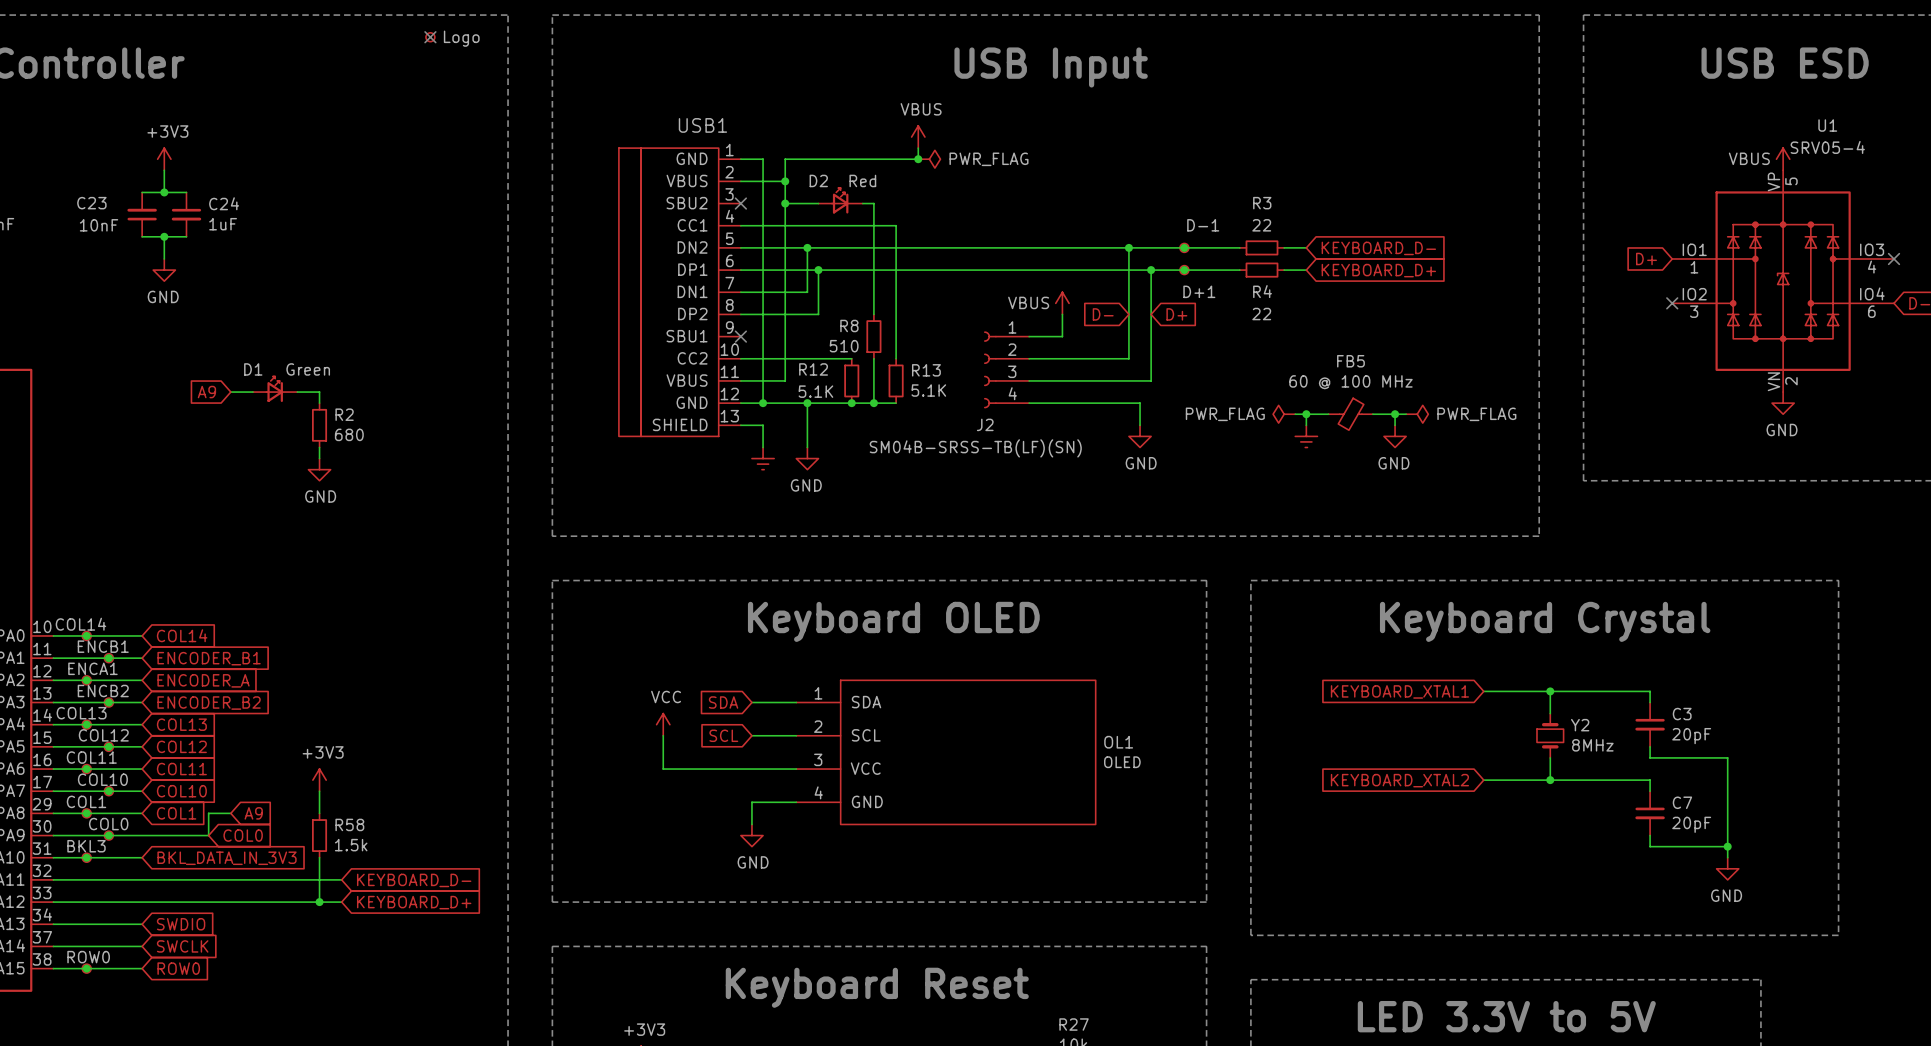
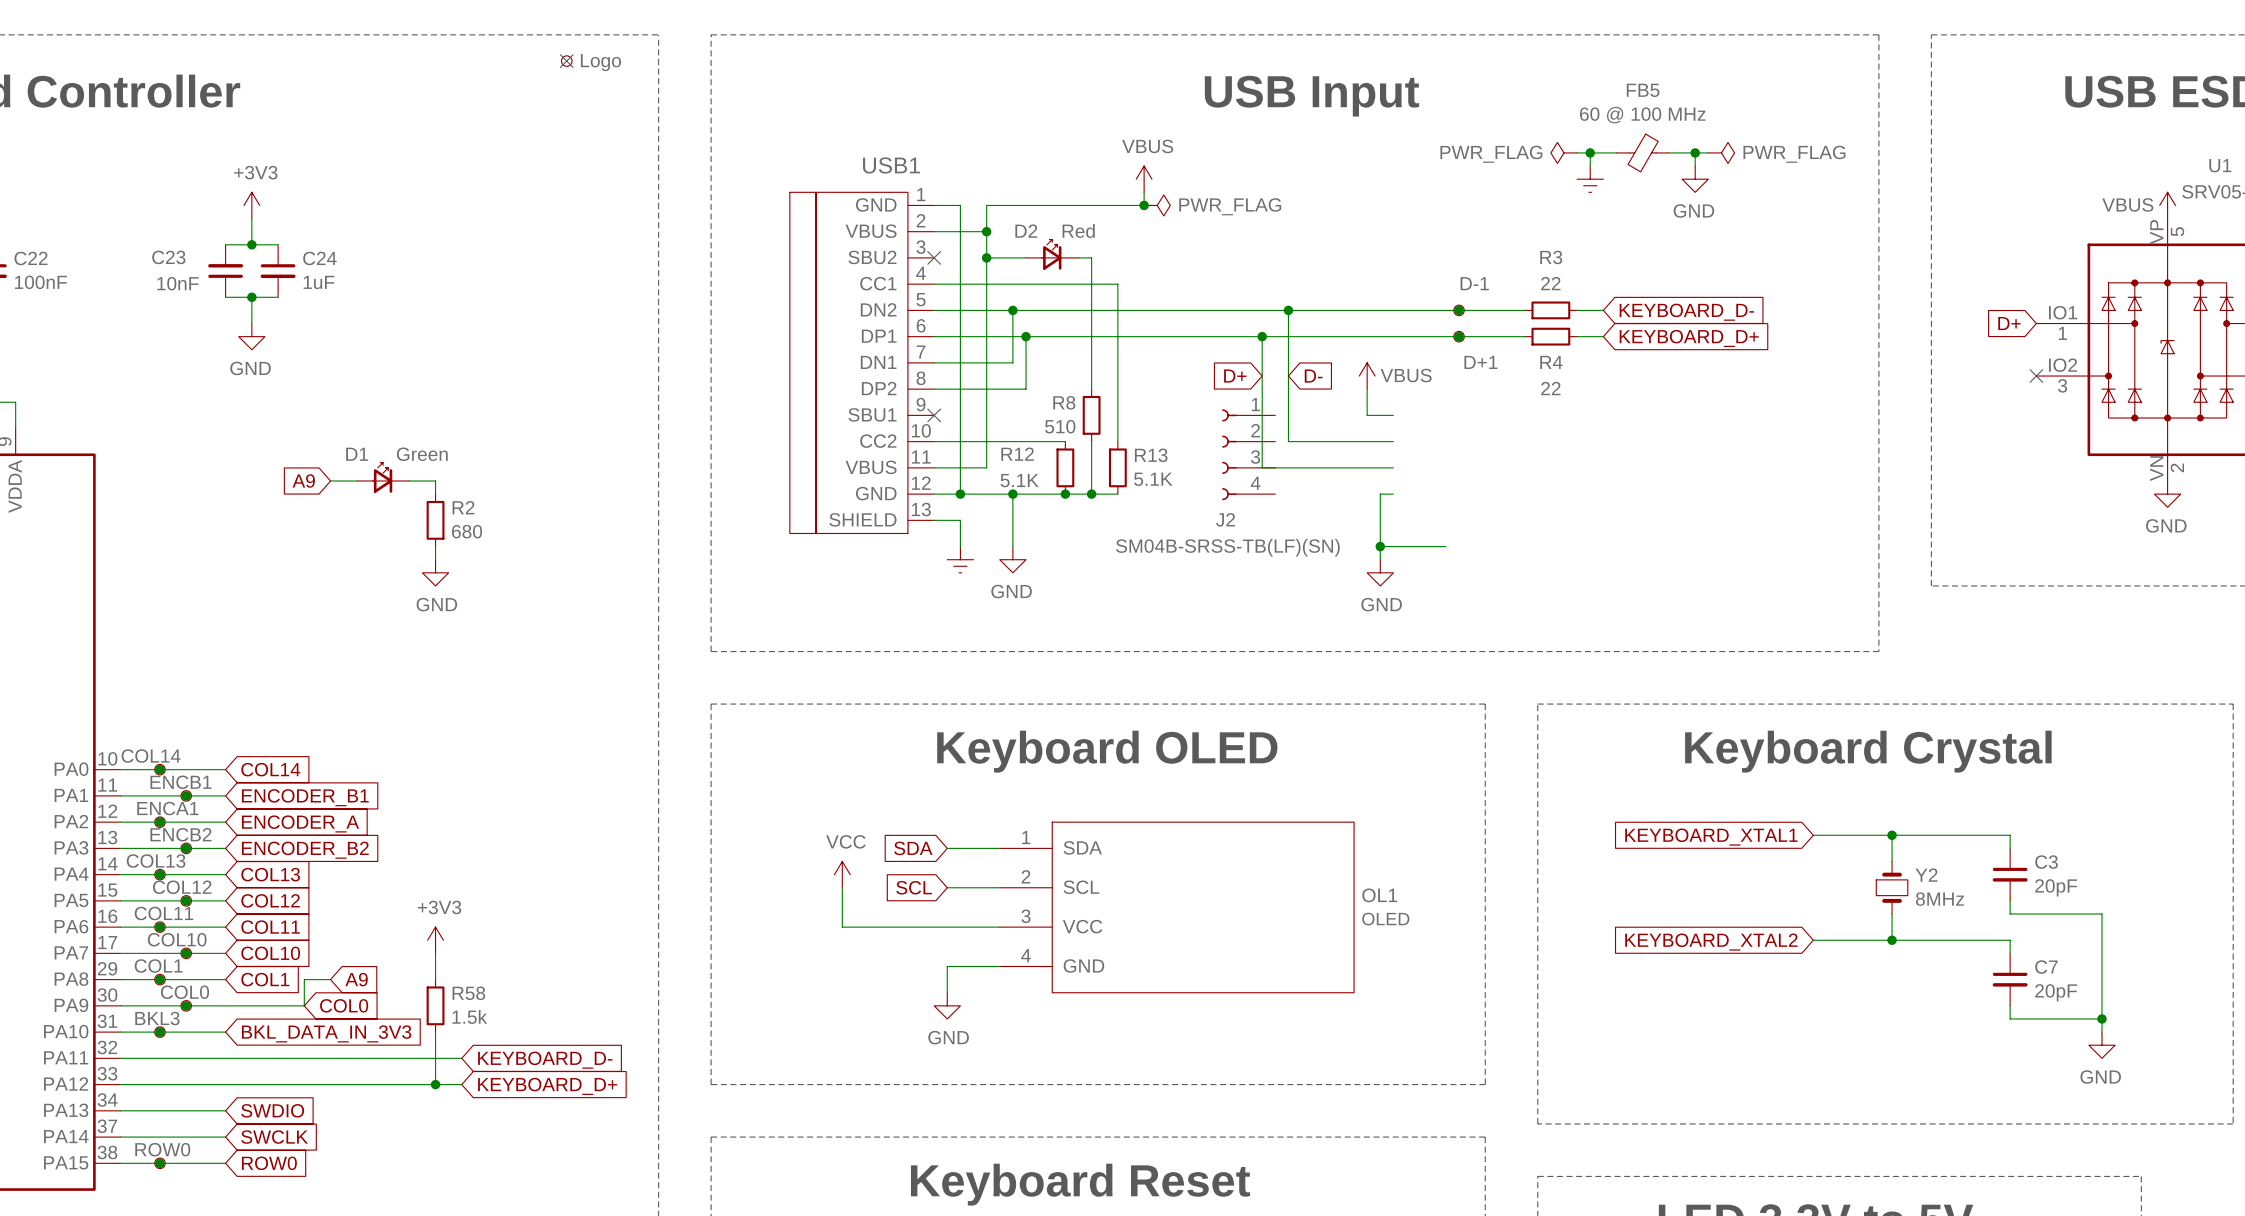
power symbol: none -> PWR_FLAG (1564, 152)
wire: none -> (1577, 152) (1616, 152)
wire: none -> (1590, 152) (1590, 166)
junction: none -> (1590, 152)
wire: none -> (1668, 152) (1708, 152)
wire: none -> (1695, 152) (1695, 166)
junction: none -> (1695, 152)
power symbol: none -> PWR_FLAG (1721, 152)
power symbol: none -> (1590, 179)
power symbol: none -> GND (1695, 179)
junction: none -> (1288, 310)
wire: (1128, 247) (1128, 358) -> none
junction: (1128, 247) -> none
wire: none -> (1262, 336) (1262, 467) (1275, 467)
junction: none -> (1262, 336)
wire: (1151, 270) (1151, 380) (1128, 380) -> none
junction: (1151, 270) -> none
power symbol text position: VBUS (1028, 302) -> VBUS (1406, 375)
power symbol position: VBUS (1062, 303) -> VBUS (1367, 376)
wire: (1062, 314) (1062, 336) (1029, 336) -> none
global label rotation: 0° (1103, 314) -> 180° (1313, 376)
wire: none -> (1367, 389) (1367, 415) (1393, 415)
global label rotation: 0° (1176, 314) -> 180° (1235, 376)
global label position: D+ (1176, 314) -> D+ (1235, 376)
wire: (1029, 358) (1040, 358) -> (1288, 310) (1288, 441)
wire: (1029, 403) (1117, 403) -> (1380, 559) (1380, 494)
wire: (1128, 403) (1140, 403) (1140, 425) -> none
power symbol: PWR_FLAG (1284, 414) -> none
wire: (1295, 414) (1328, 414) -> none
wire: (1306, 414) (1306, 425) -> none
junction: (1306, 414) -> none
FB5 position: (1350, 414) -> (1642, 152)
wire: (1372, 414) (1406, 414) -> none
wire: (1395, 414) (1395, 425) -> none
junction: (1395, 414) -> none
power symbol: PWR_FLAG (1417, 414) -> none
power symbol position: GND (1140, 436) -> GND (1380, 572)
power symbol: (1306, 436) -> none
power symbol: GND (1395, 436) -> none
wire: none -> (1380, 546) (1445, 546)
junction: none -> (1380, 546)

